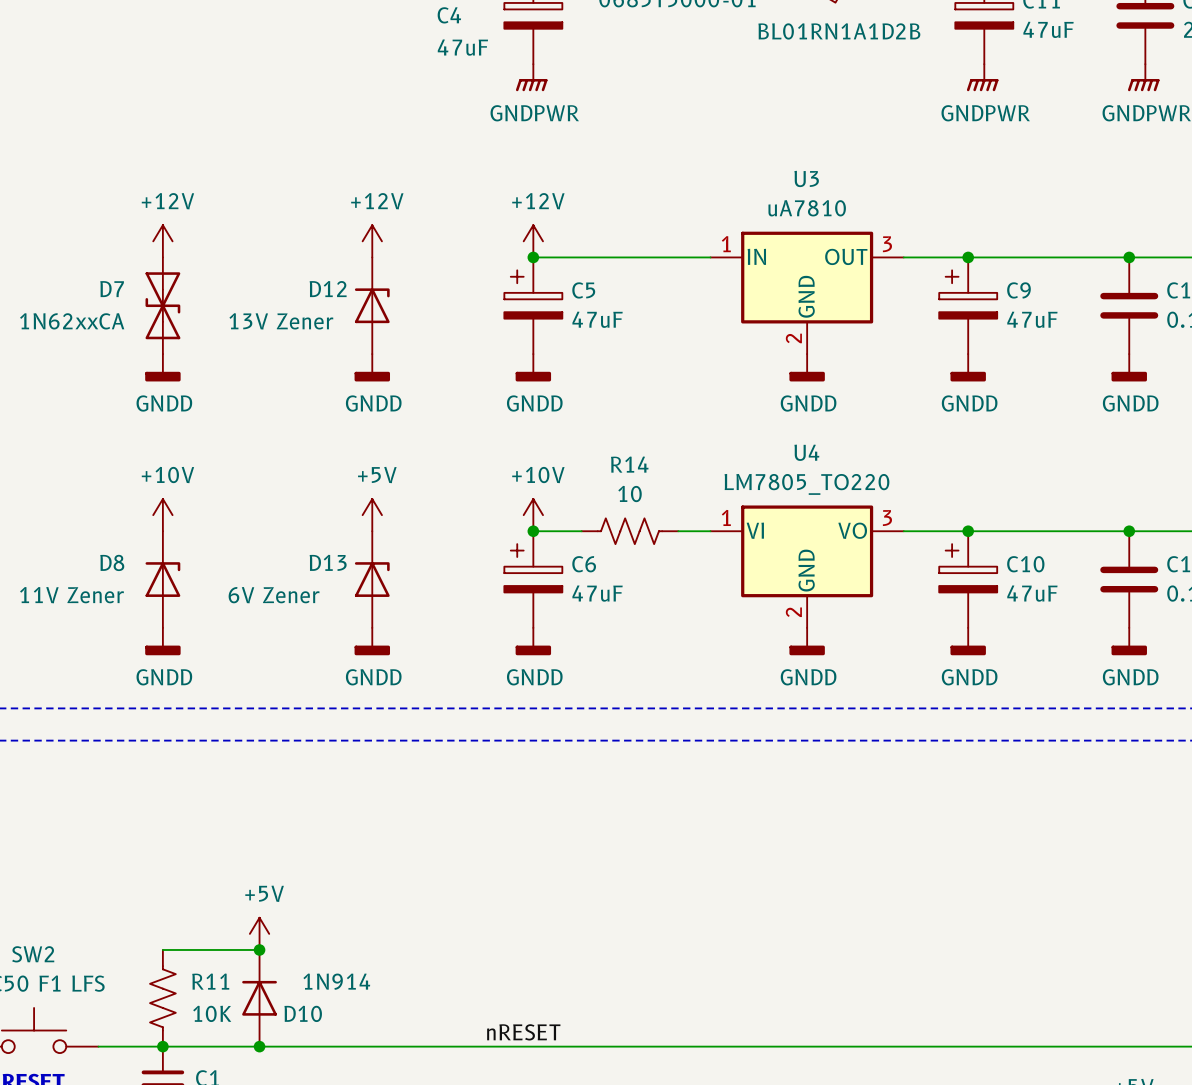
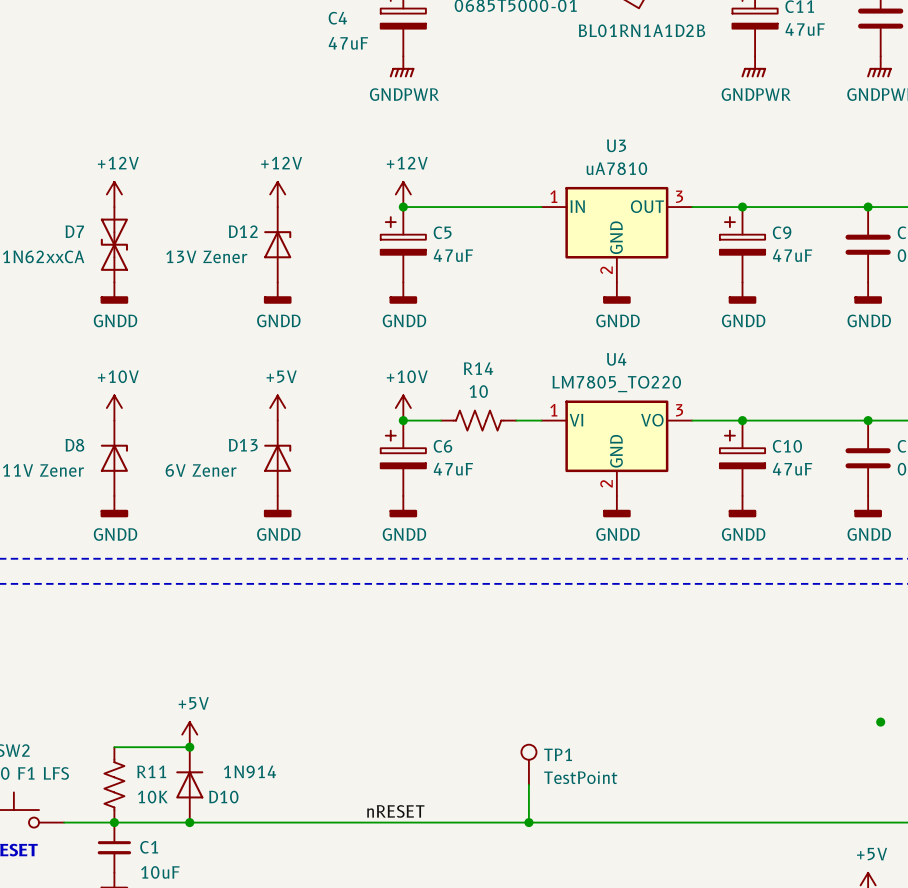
junction: none -> (880, 722)
TP1: none -> TestPoint (528, 764)
wire: none -> (528, 784) (528, 822)
junction: none -> (528, 822)

